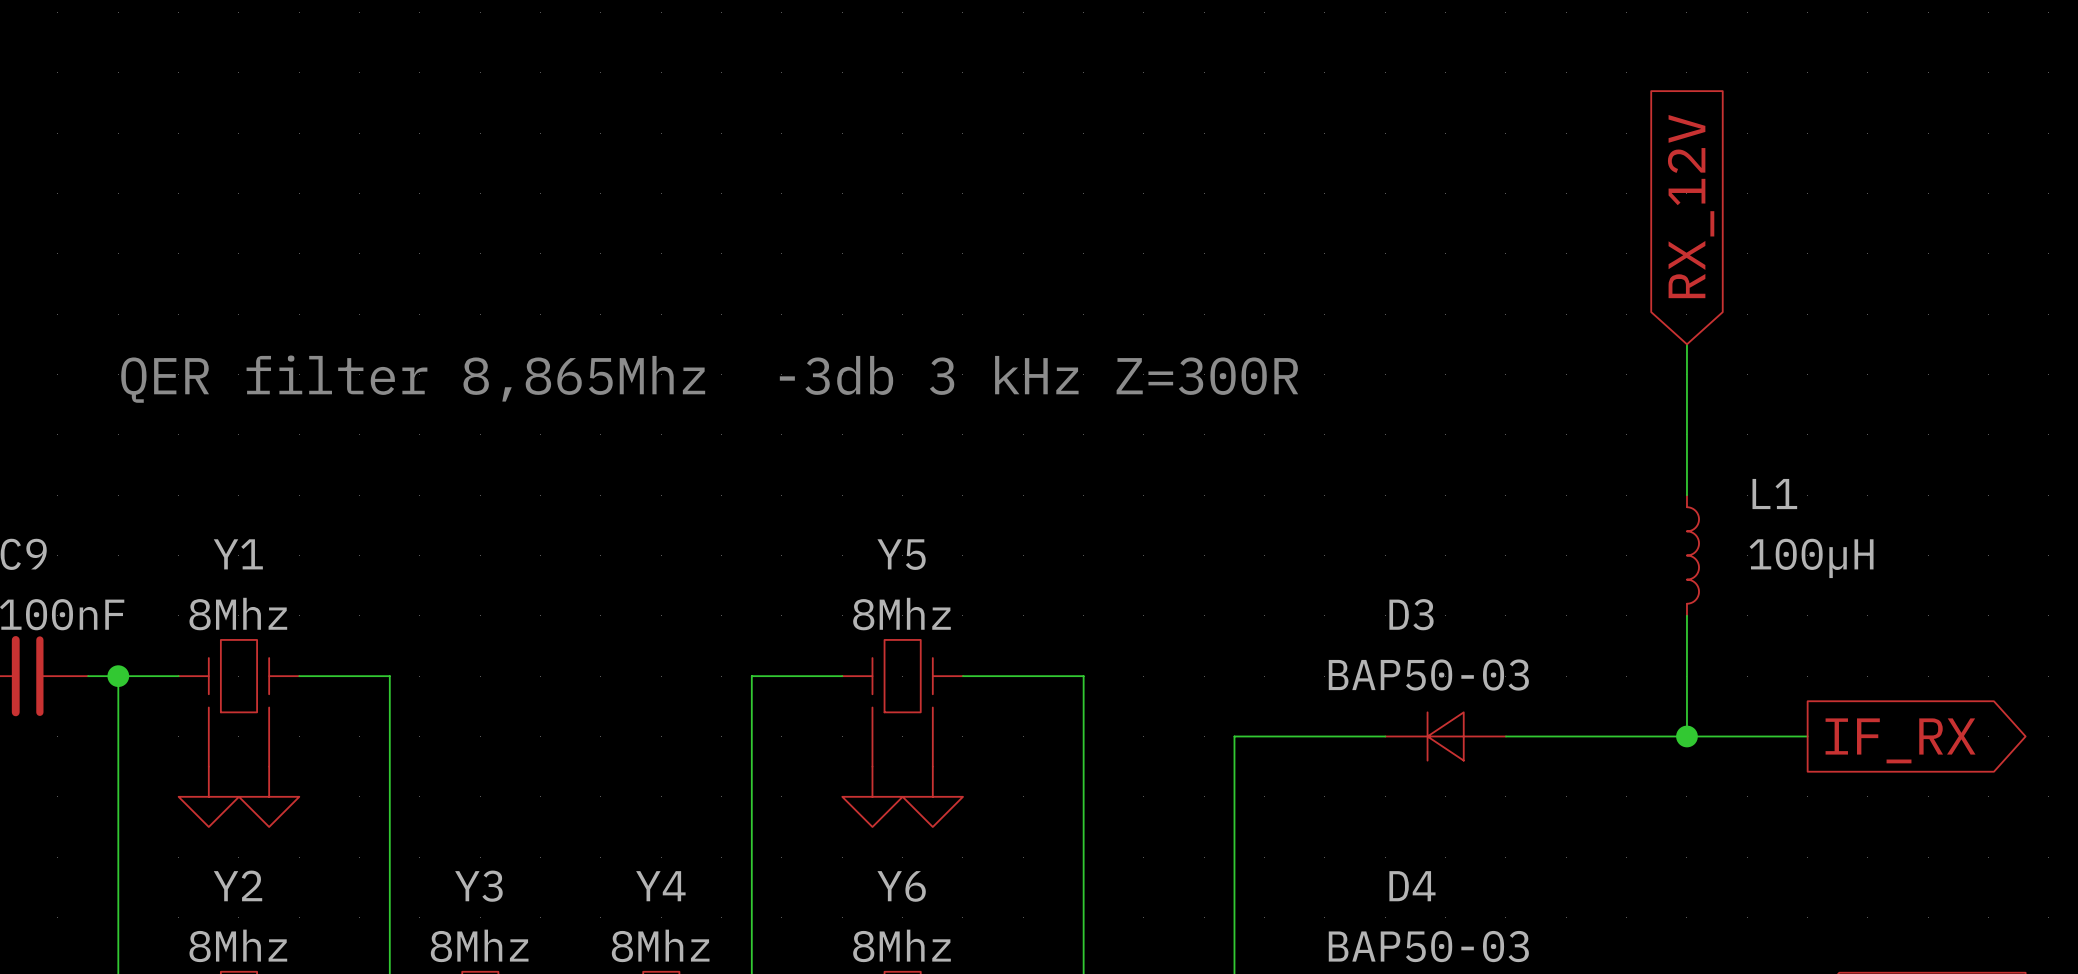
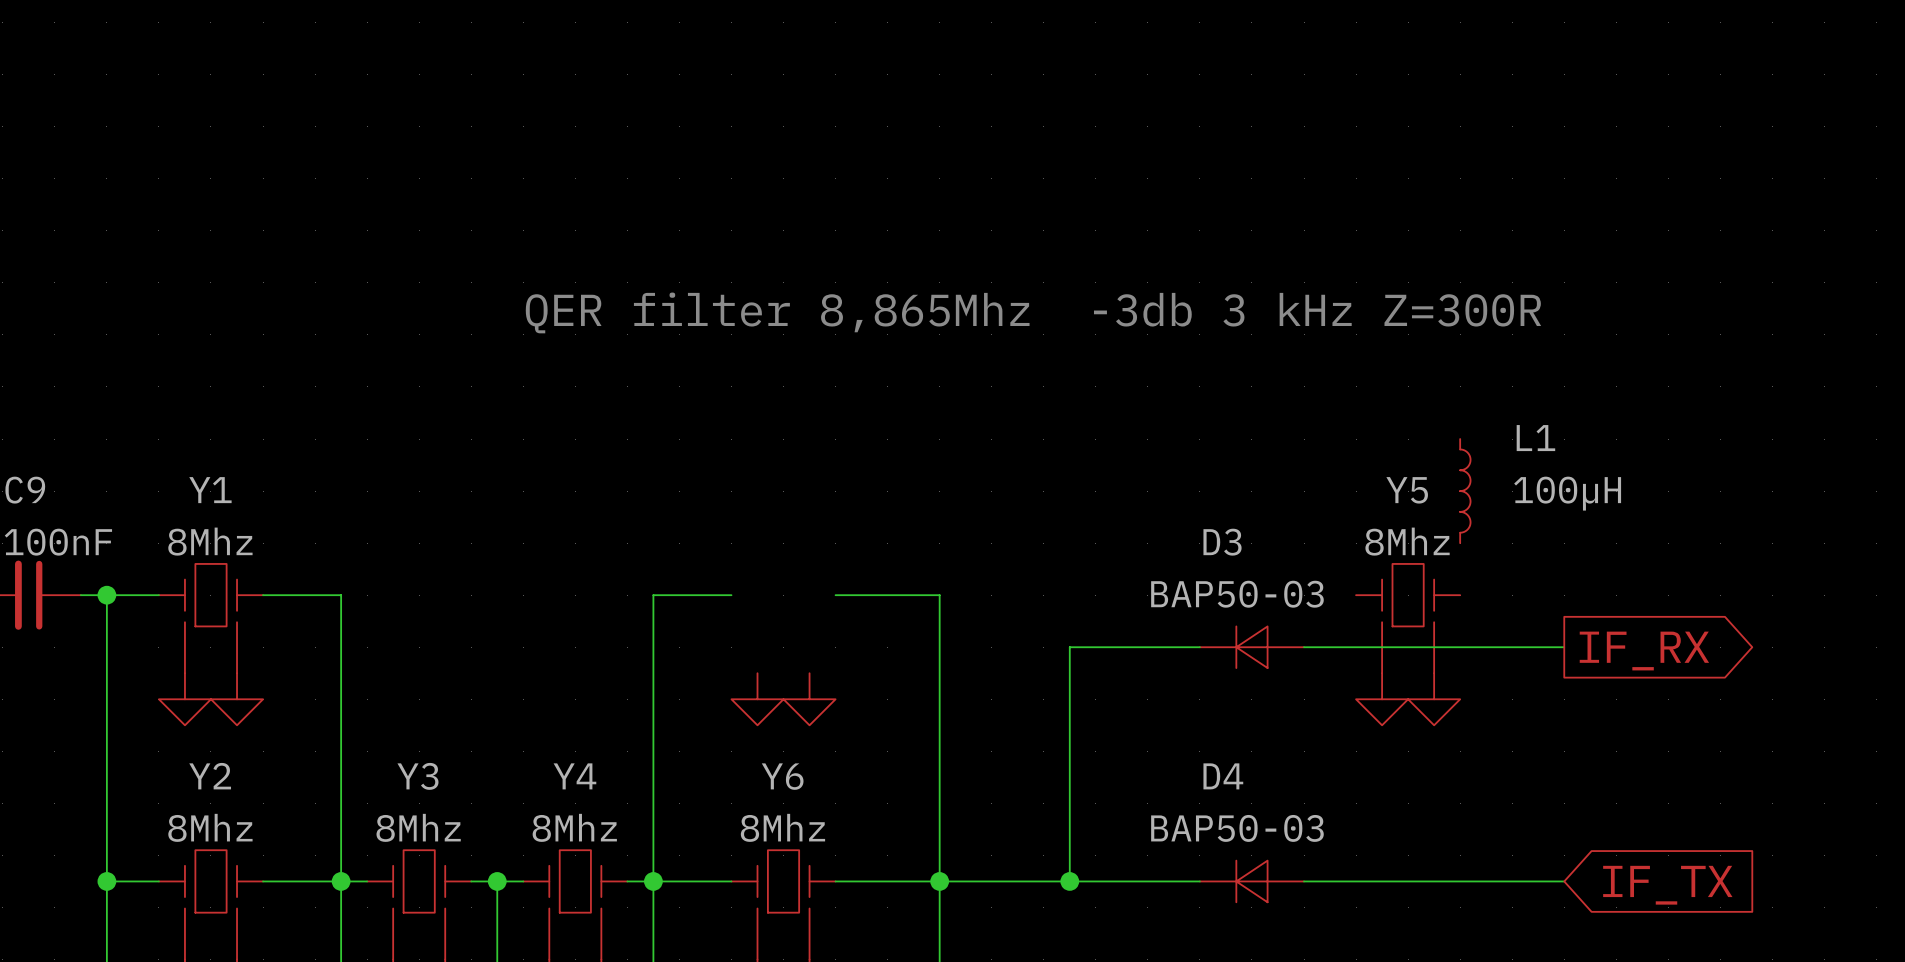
global label: RX_12V (1691, 206) -> none
wire: (1686, 344) (1686, 495) -> none
text position: QER filter 8,865Mhz -3db 3 kHz Z=300R (709, 379) -> QER filter 8,865Mhz -3db 3 kHz Z=300R (1033, 312)
wire: (1686, 615) (1686, 736) -> none
Y5 position: (902, 703) -> (1408, 618)
junction: (1686, 736) -> none
power symbol: none -> (1382, 699)
power symbol: none -> (1434, 699)

